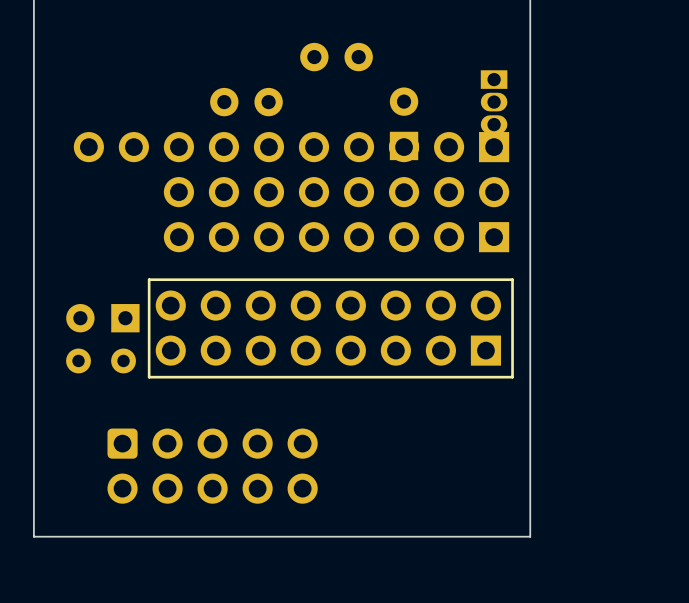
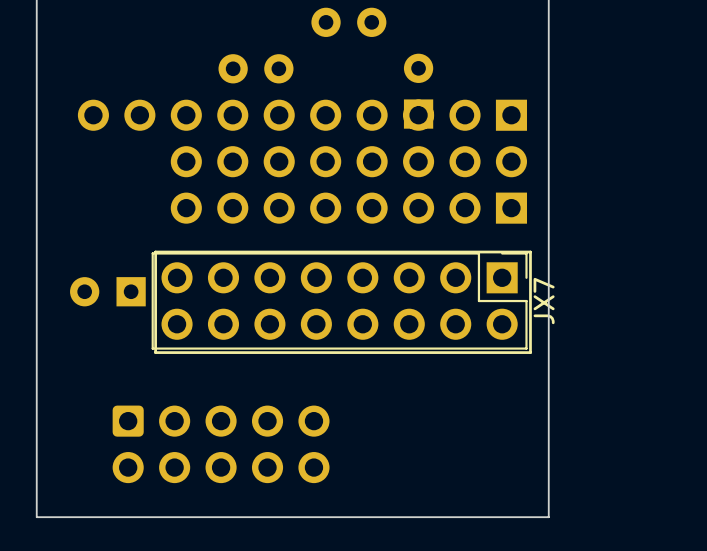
part: (494, 102) -> none
JX7 side: bottom (328, 328) -> top (339, 301)
part: (101, 360) -> none

